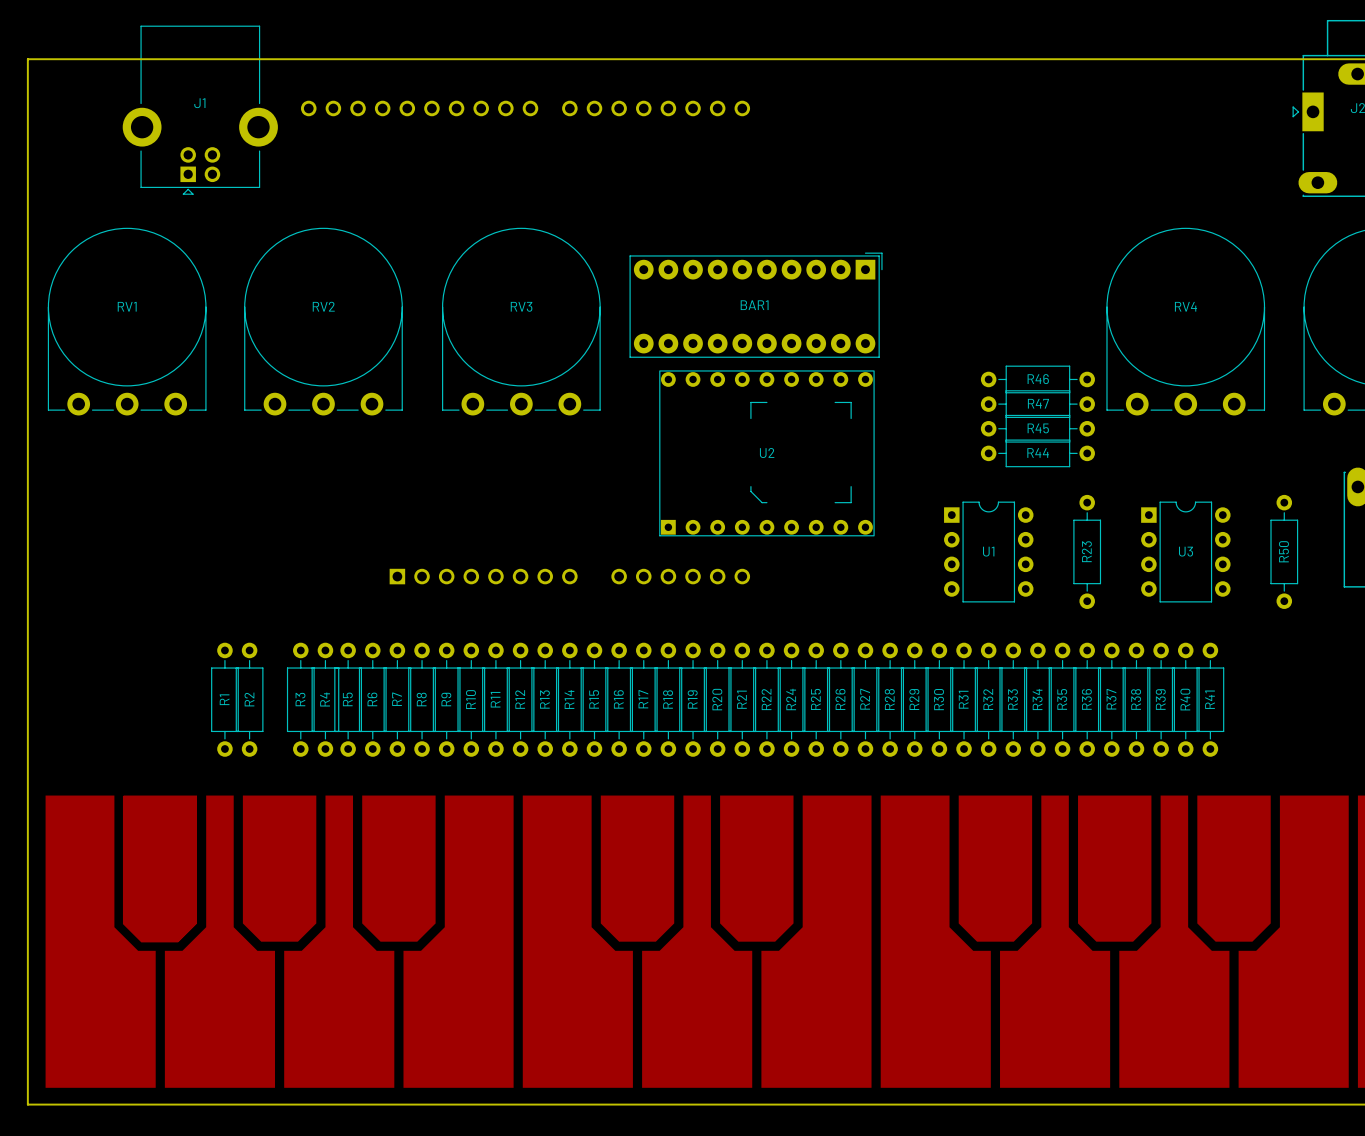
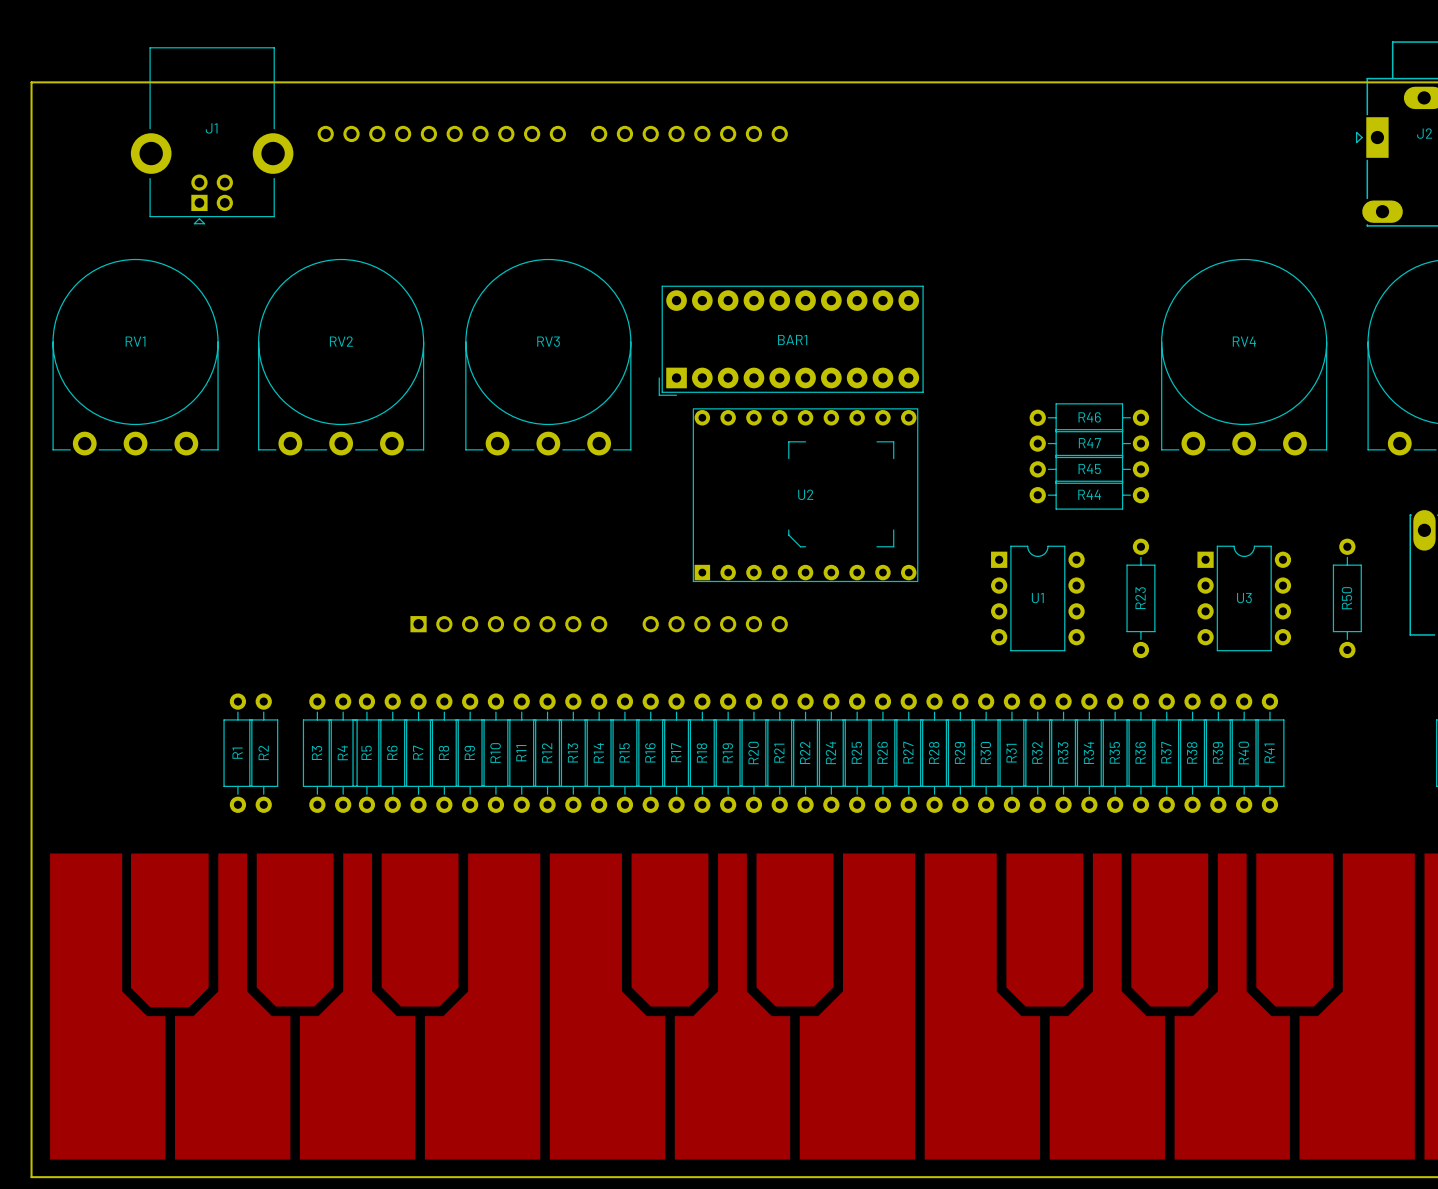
BAR1 rotation: 0° (756, 305) -> 180° (791, 340)

